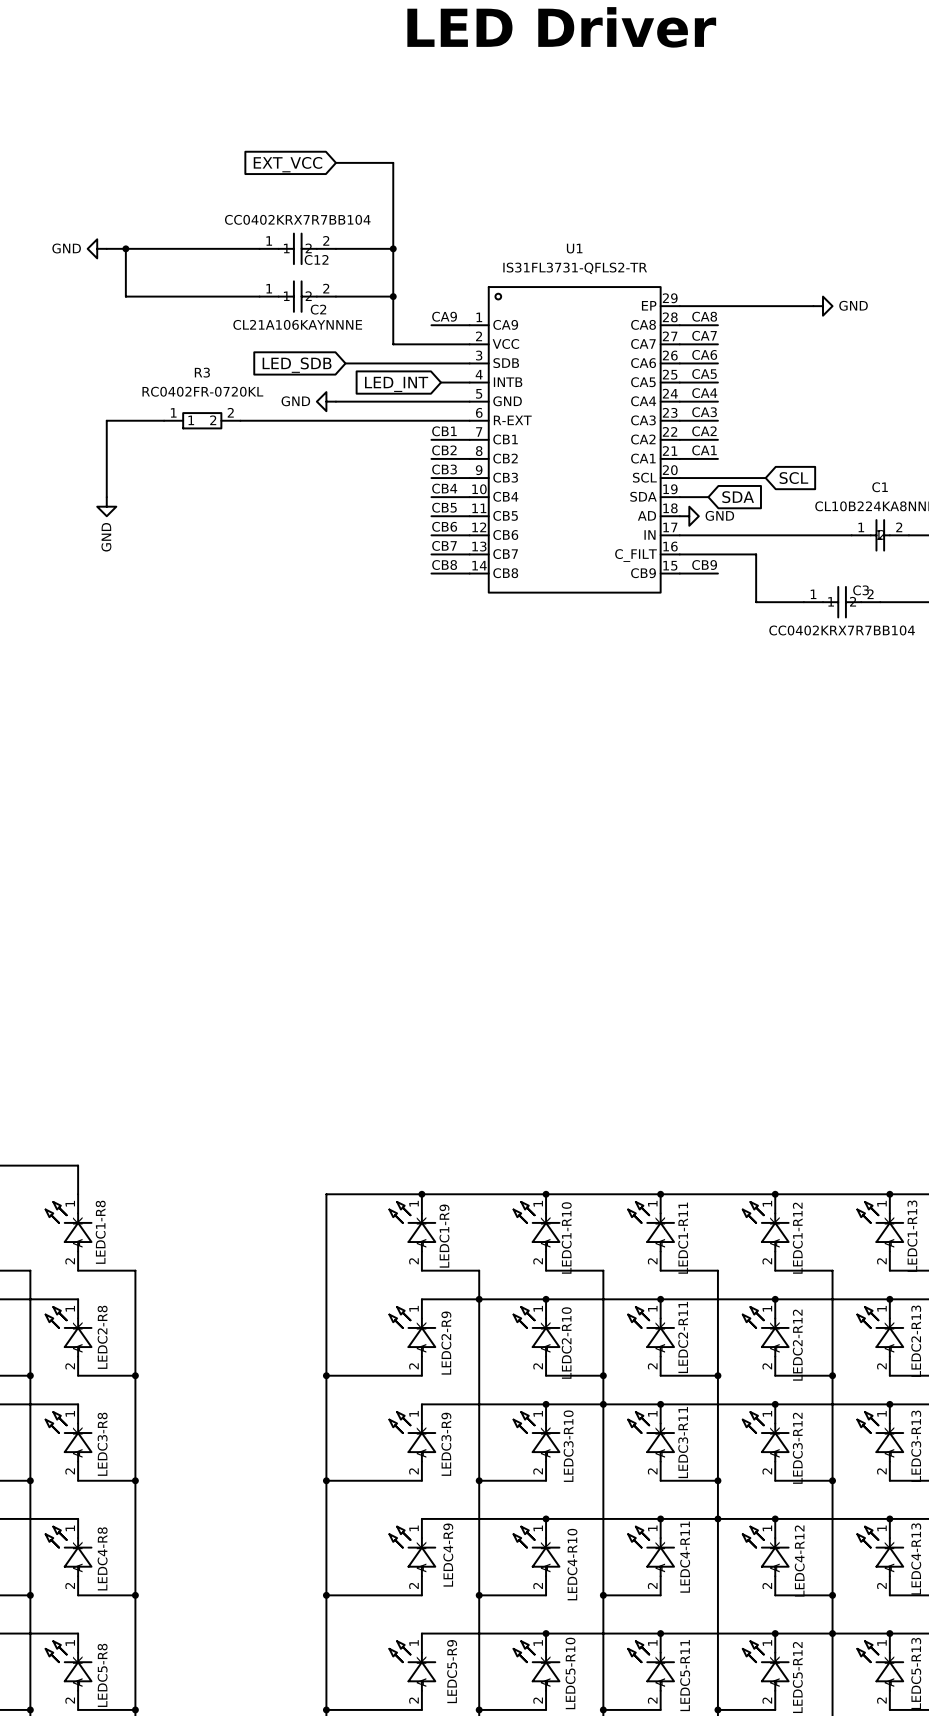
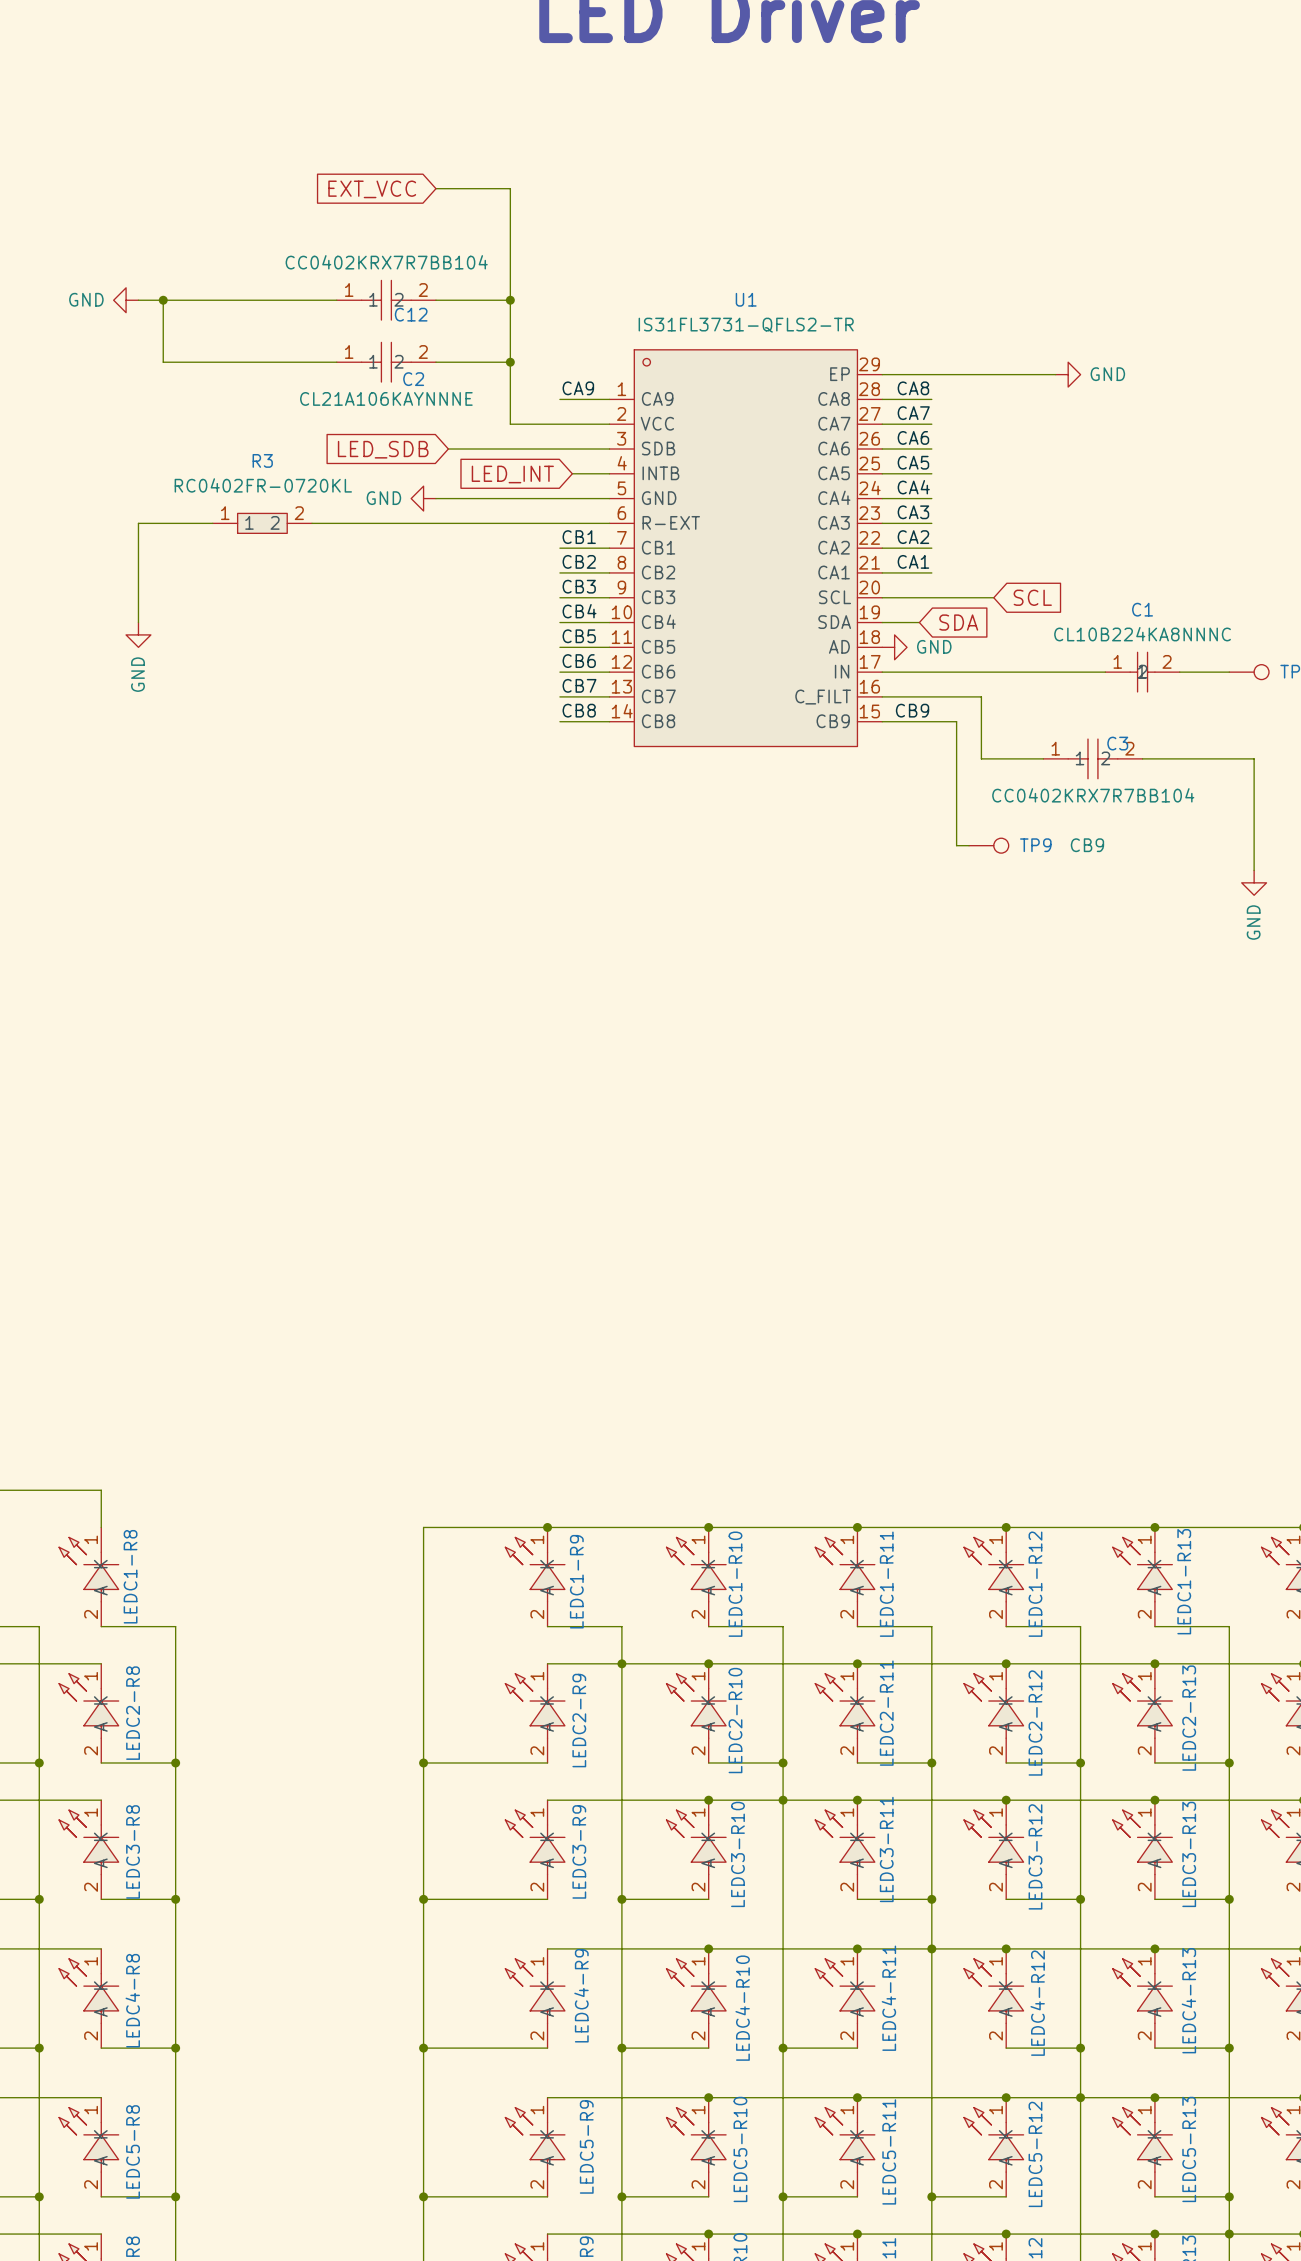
wire: none -> (931, 721) (956, 721) (956, 845) (969, 845)
TP9: none -> CB9 (988, 845)

